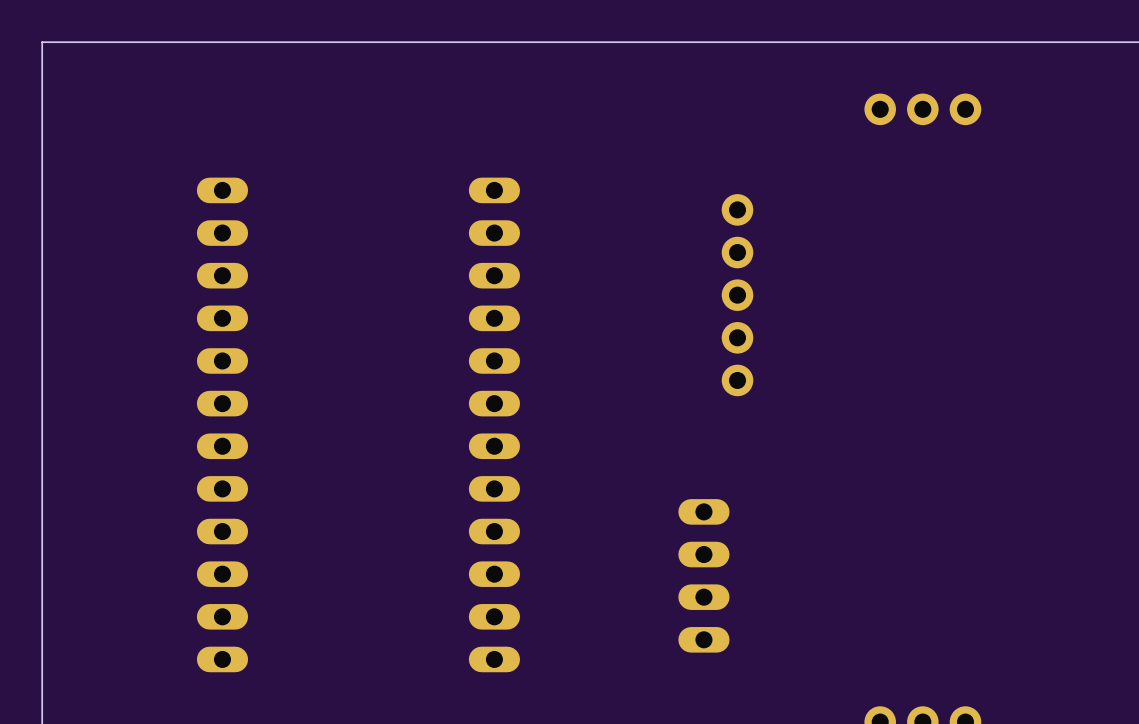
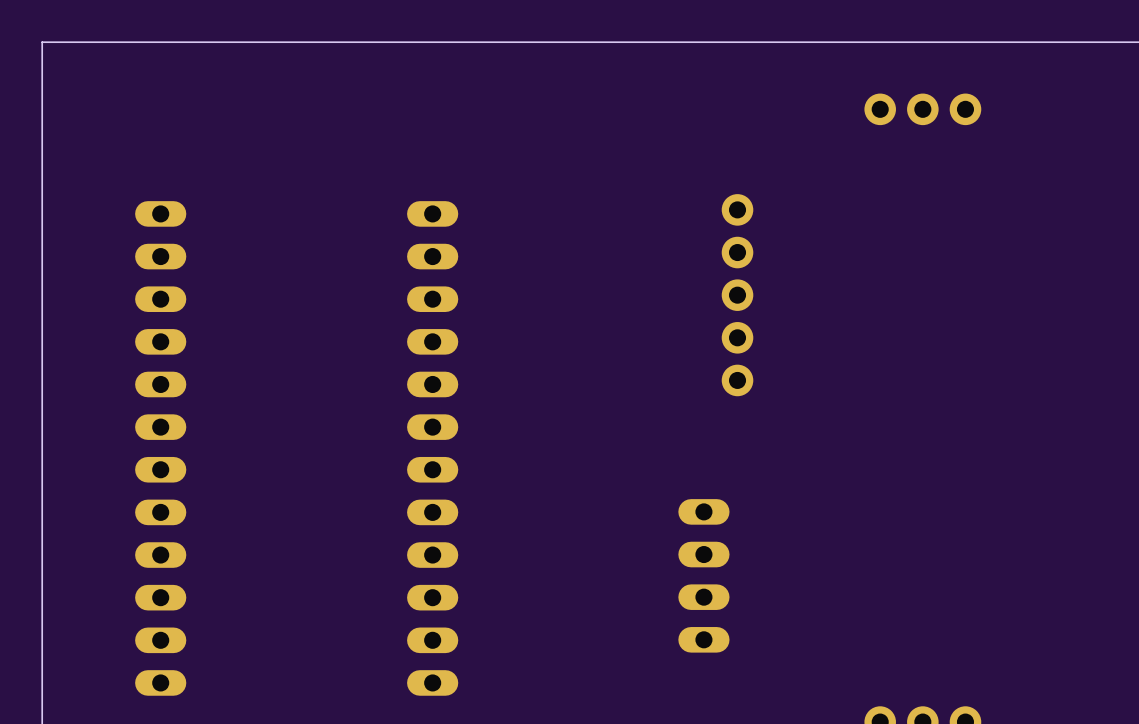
part position: (222, 424) -> (160, 448)
part position: (494, 424) -> (432, 448)

